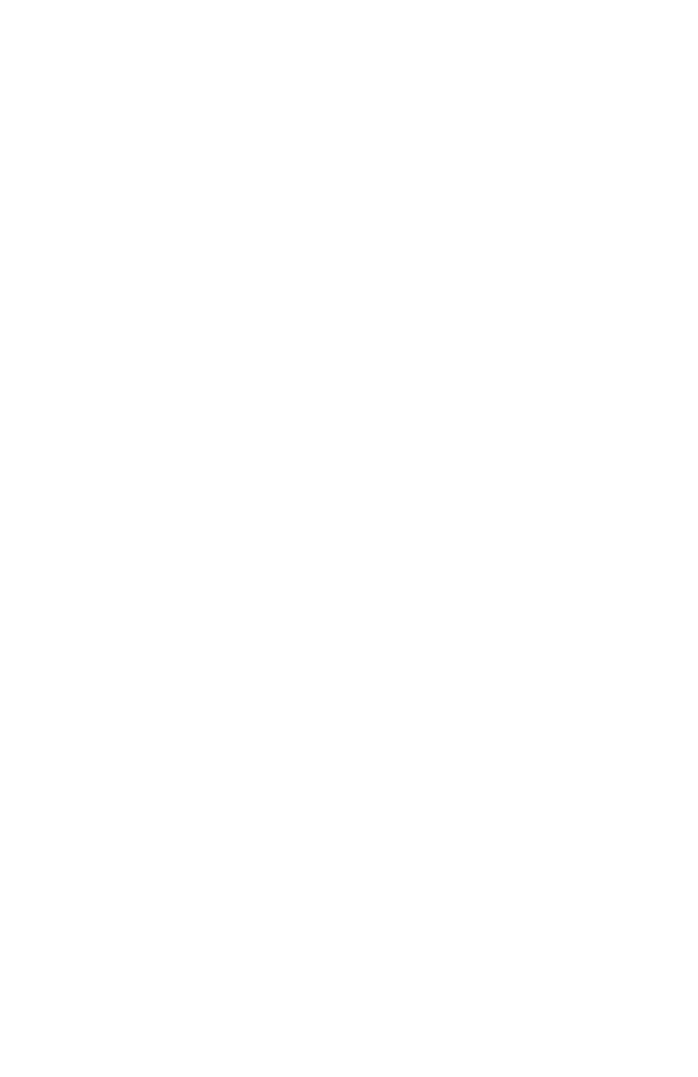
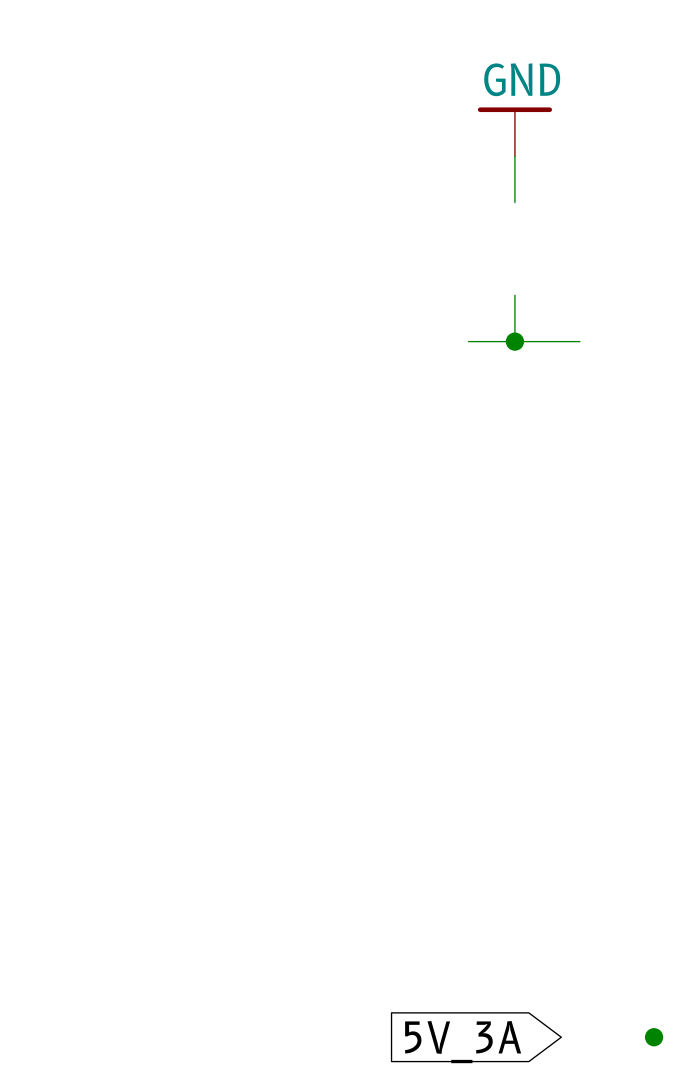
power symbol: none -> GND (514, 131)
wire: none -> (514, 156) (514, 202)
wire: none -> (514, 295) (514, 341)
wire: none -> (468, 341) (579, 341)
junction: none -> (514, 341)
junction: none -> (654, 1037)
global label: none -> 5V_3A (463, 1042)

